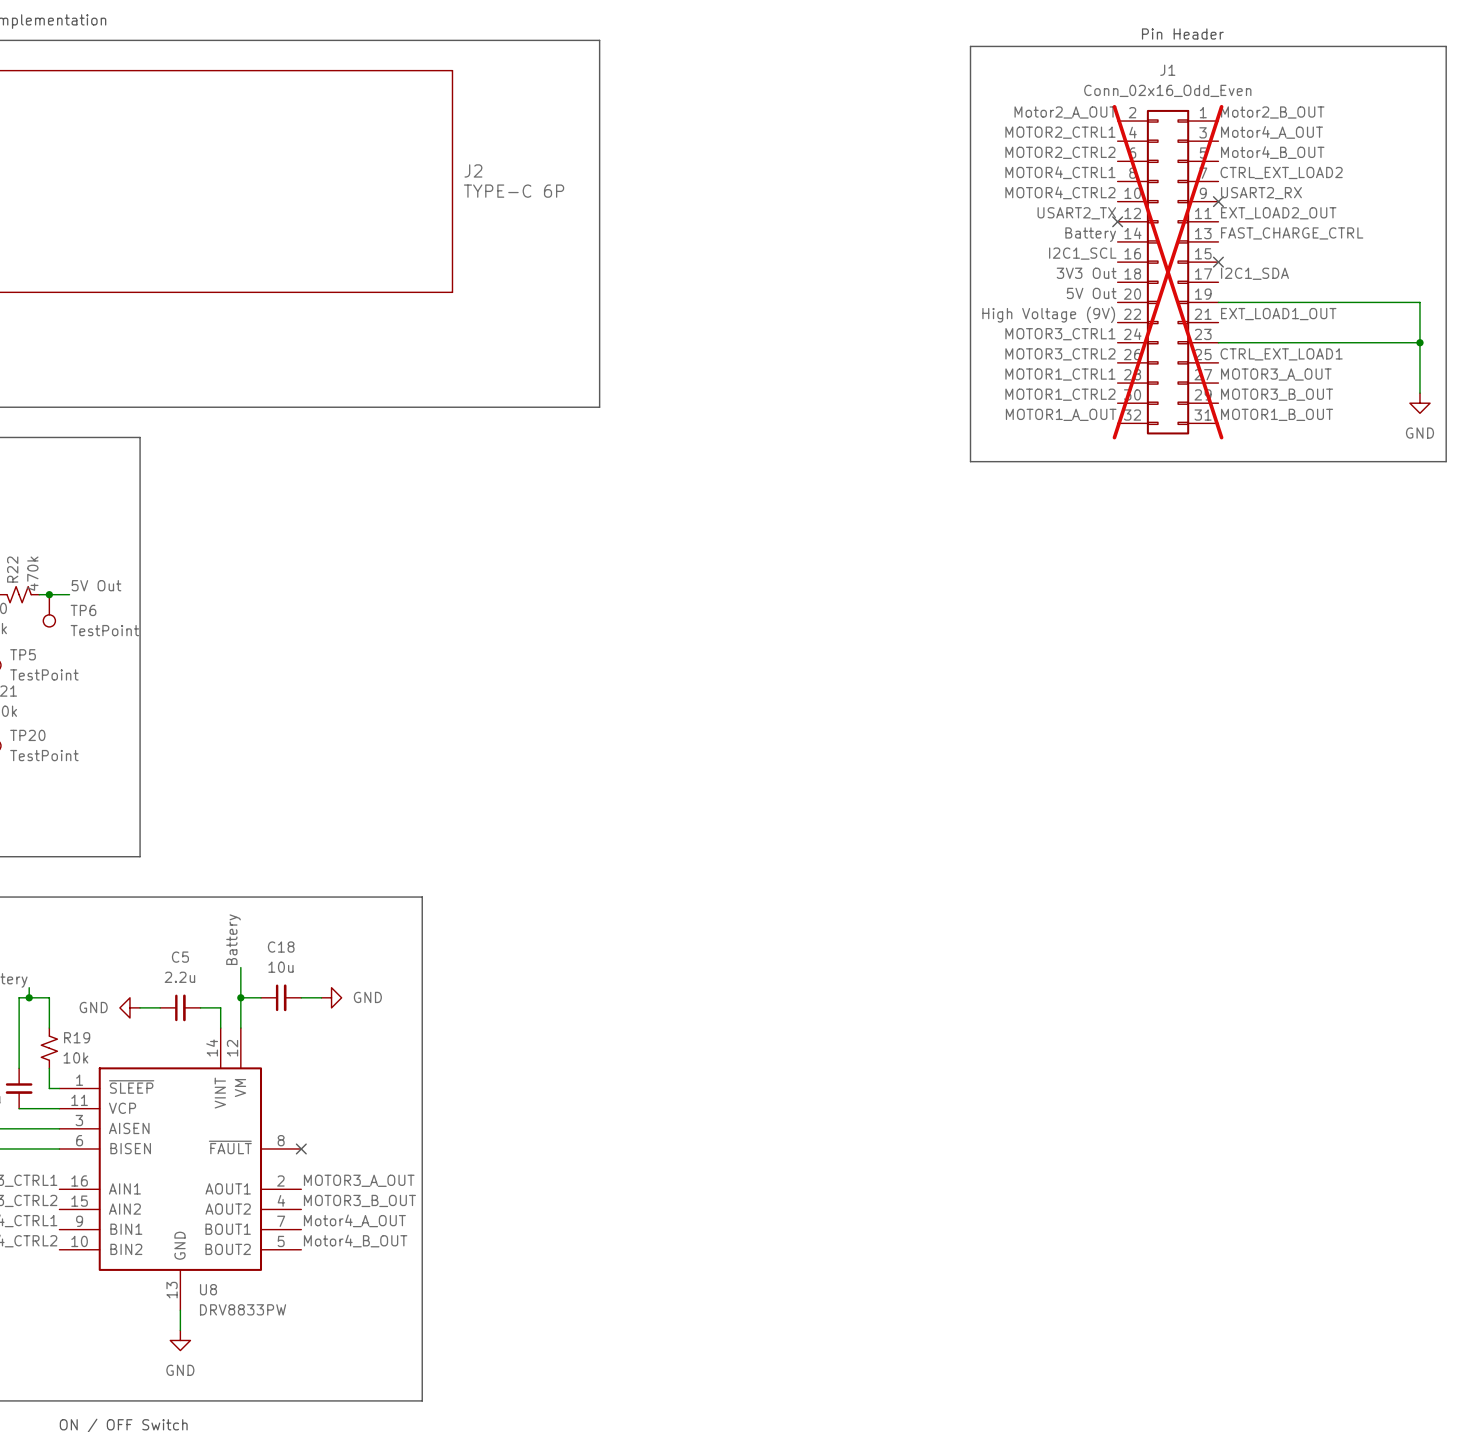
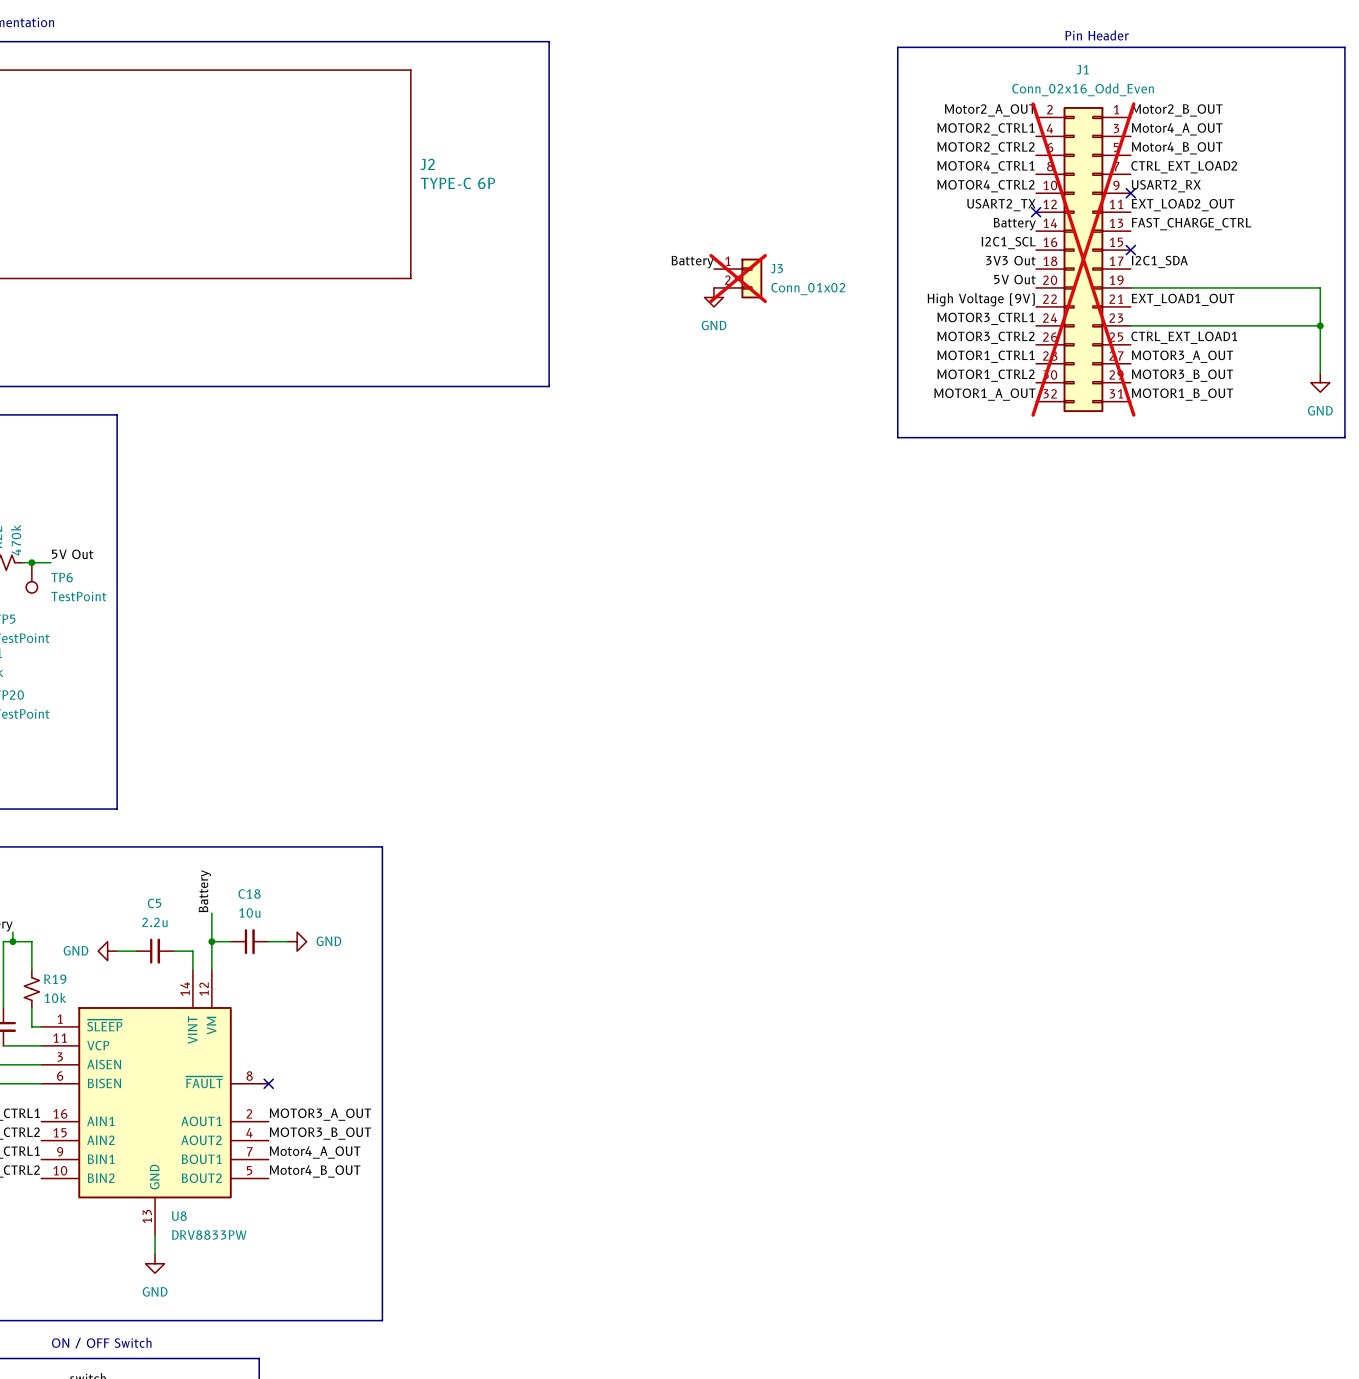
label: none -> Battery (692, 262)
J3: none -> Conn_01x02 (738, 278)
power symbol: none -> GND (713, 297)

